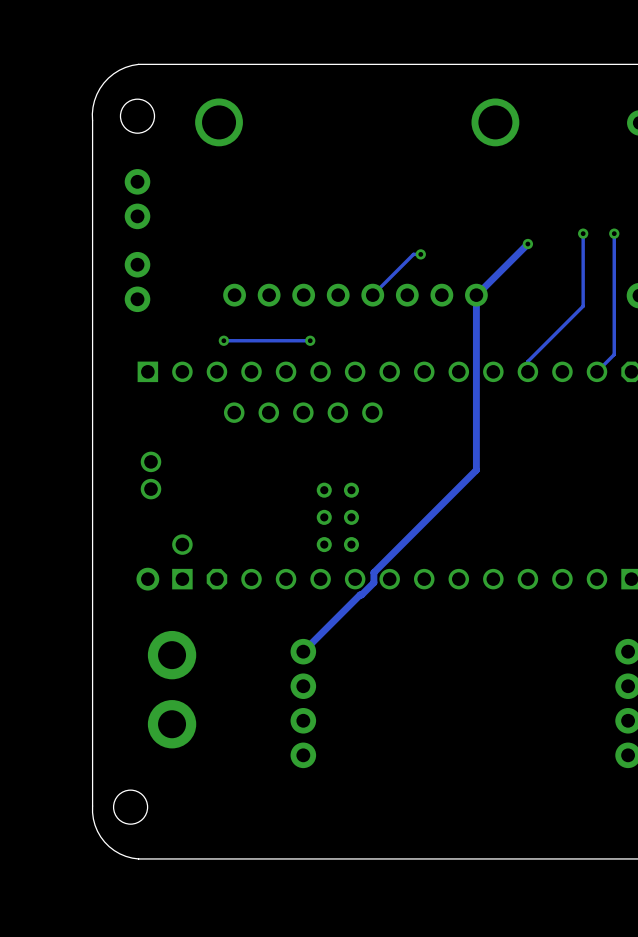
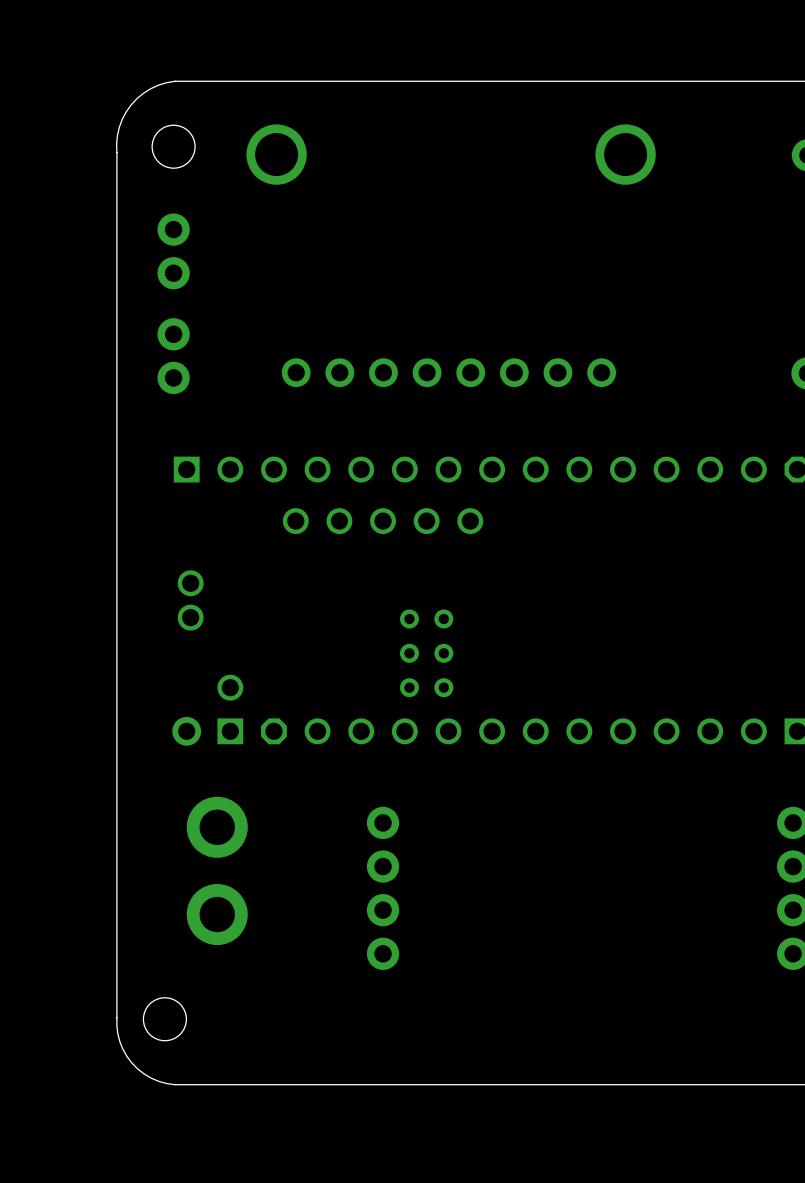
track: (583, 233) (583, 306) (527, 361) (527, 371) -> none
via: (583, 233) -> none
track: (614, 233) (614, 354) (596, 371) -> none
via: (614, 233) -> none
track: (527, 244) (476, 295) (476, 470) (373, 572) (373, 582) (303, 651) -> none
via: (527, 244) -> none
track: (420, 254) (413, 254) (372, 295) -> none
via: (420, 254) -> none
via: (223, 340) -> none
track: (310, 340) (223, 340) -> none
via: (310, 340) -> none

